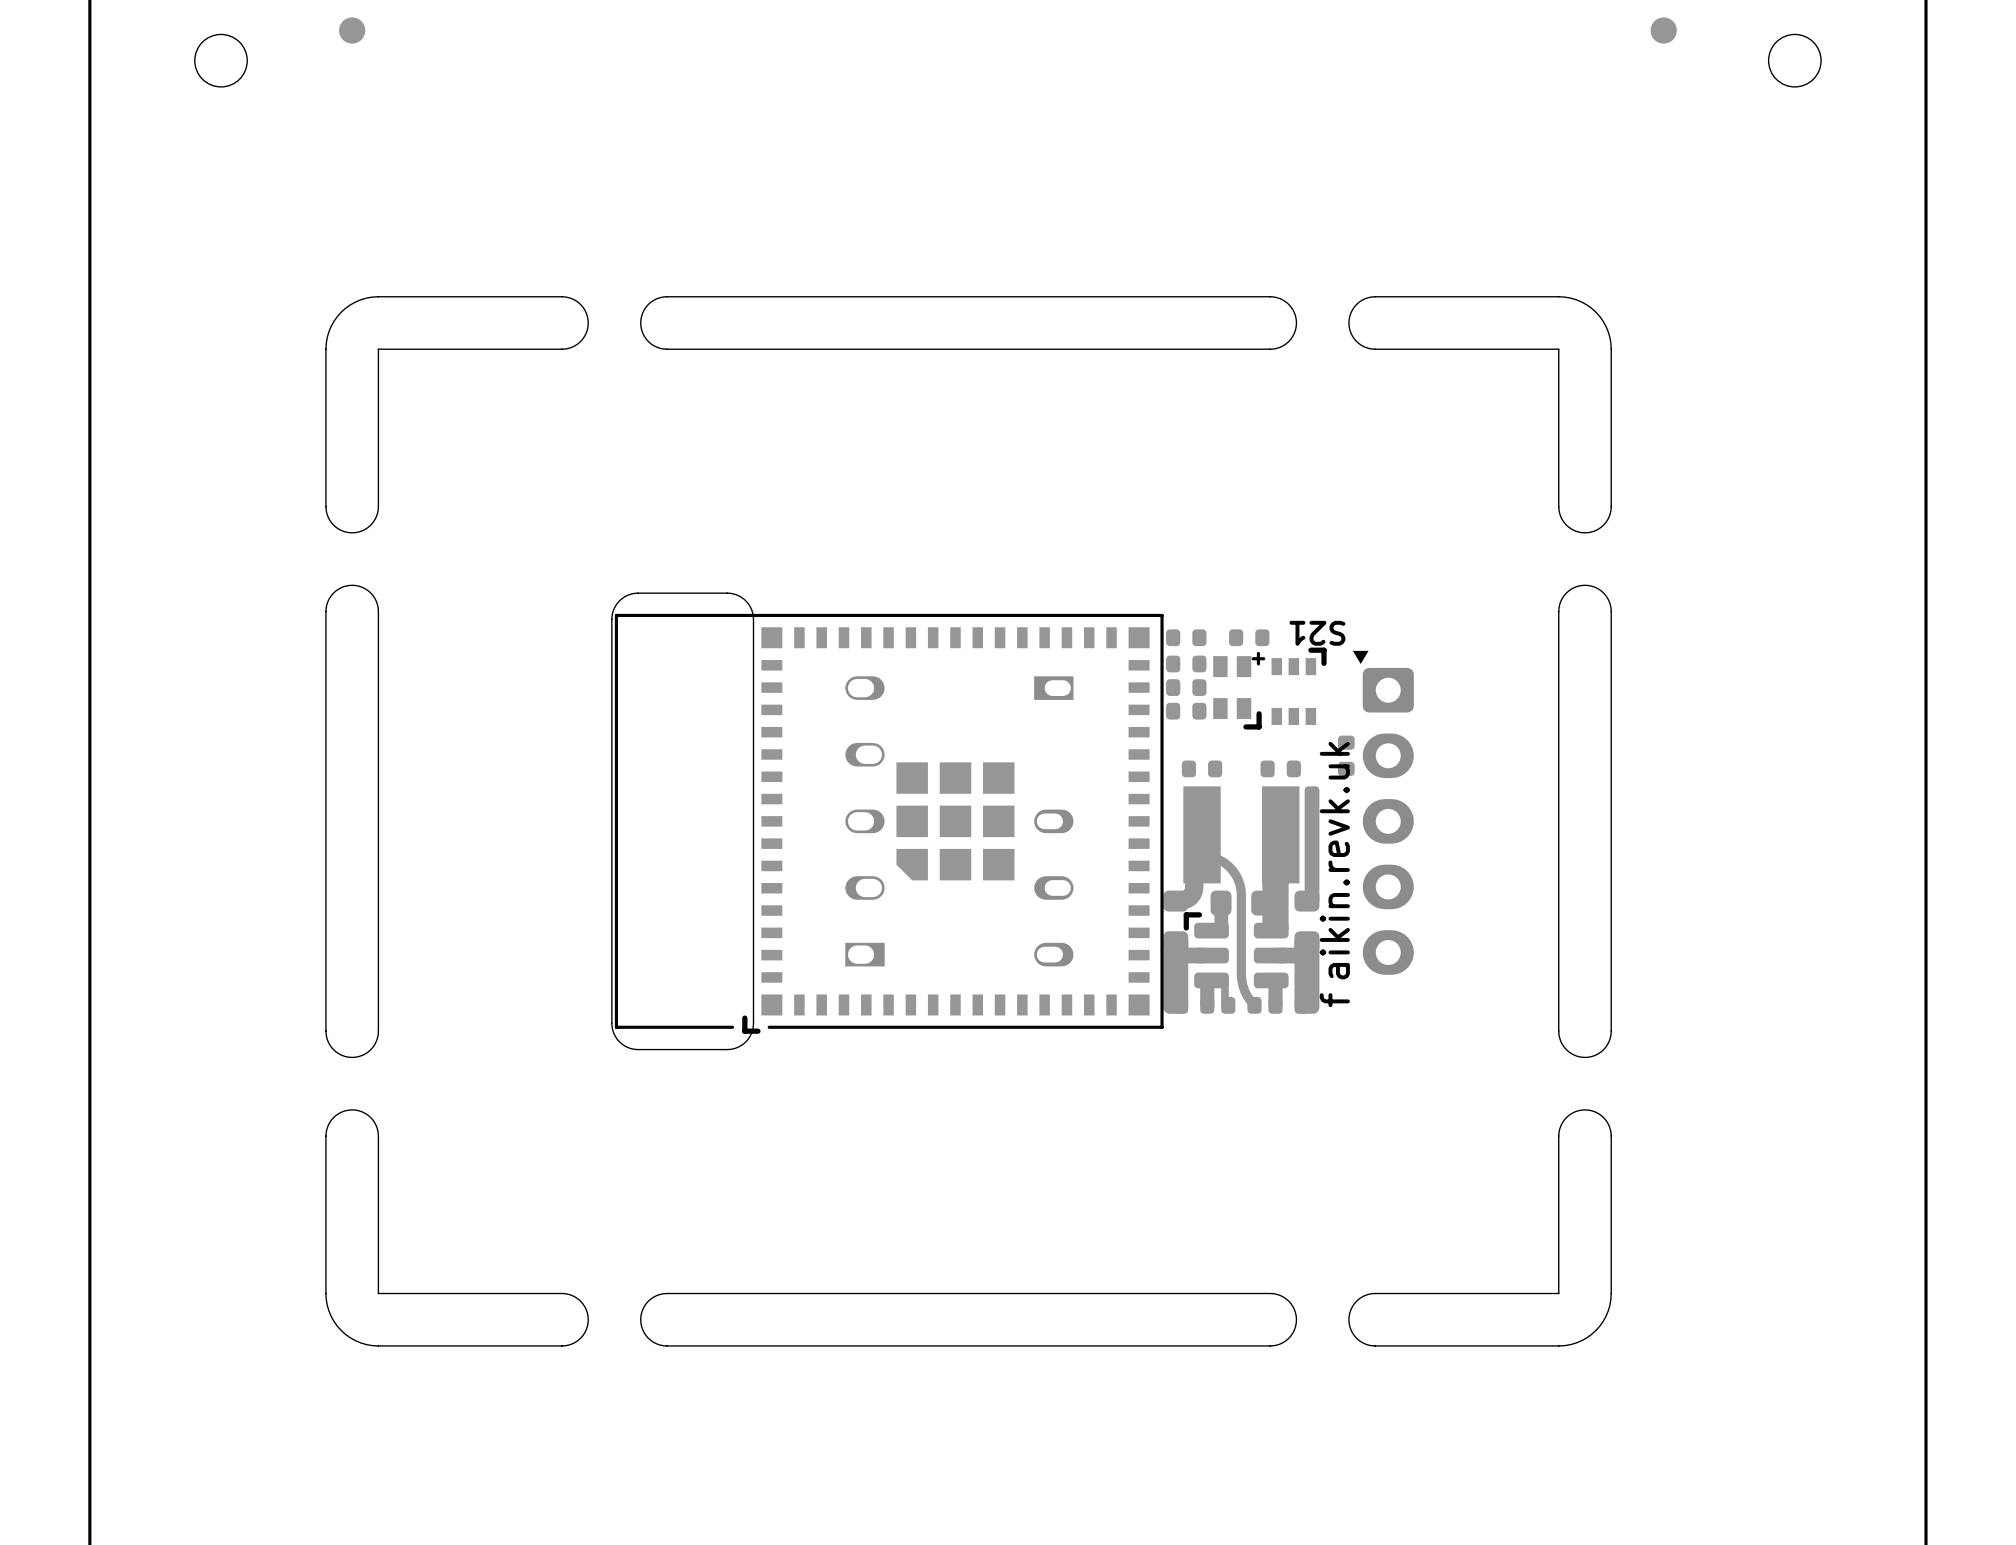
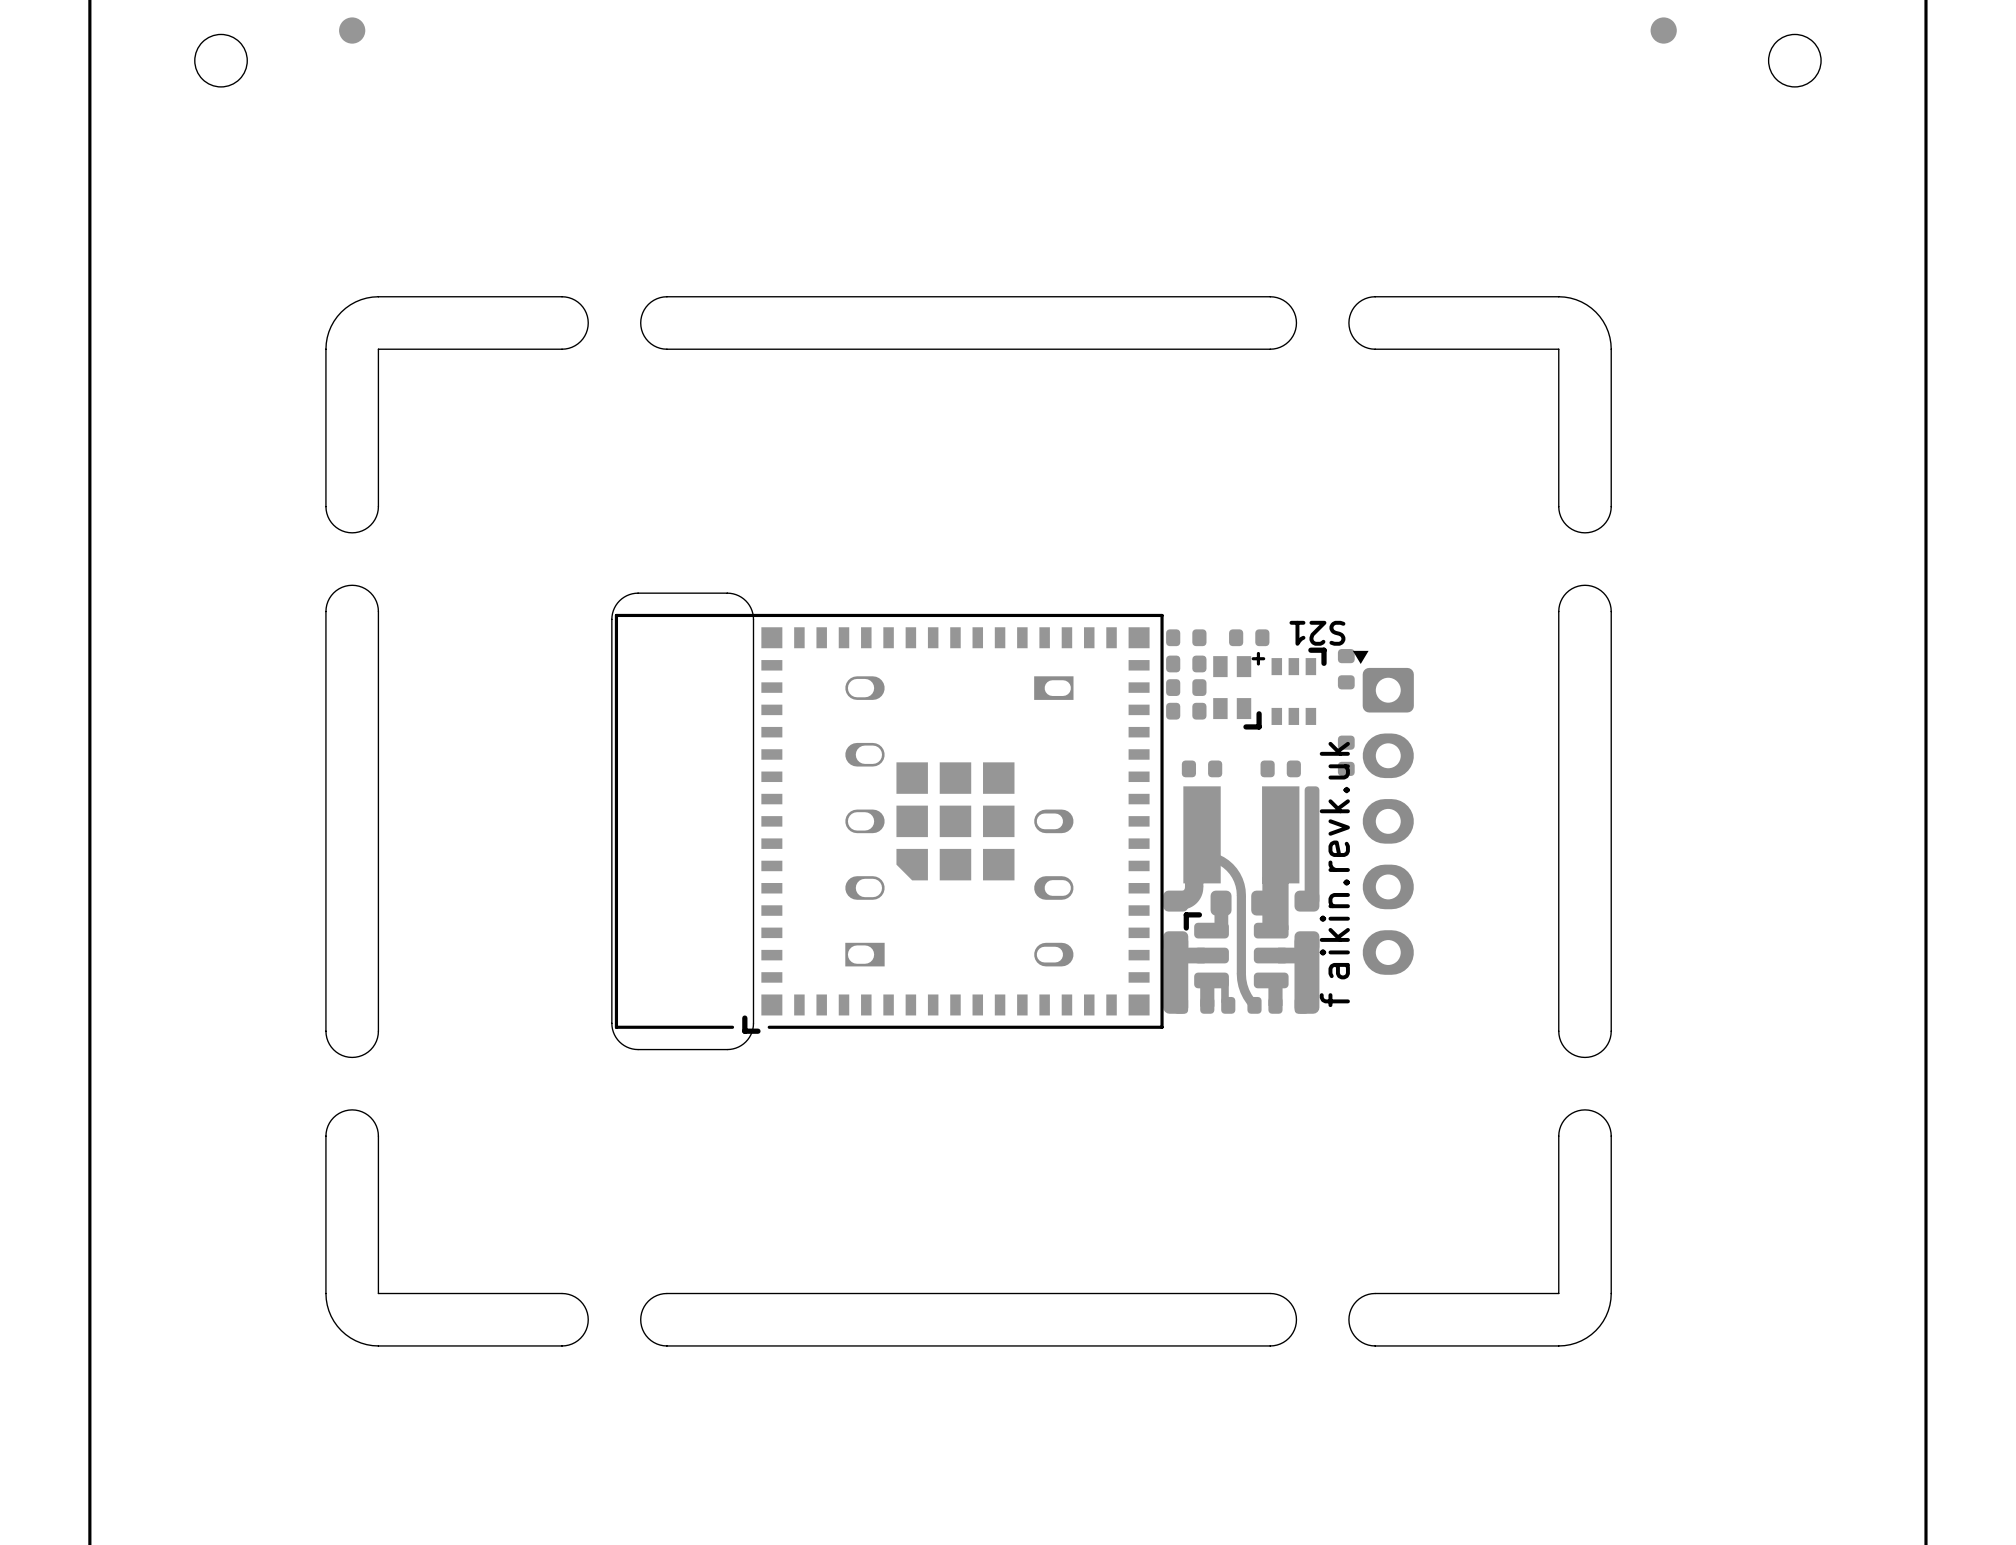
part: none -> (1346, 669)

